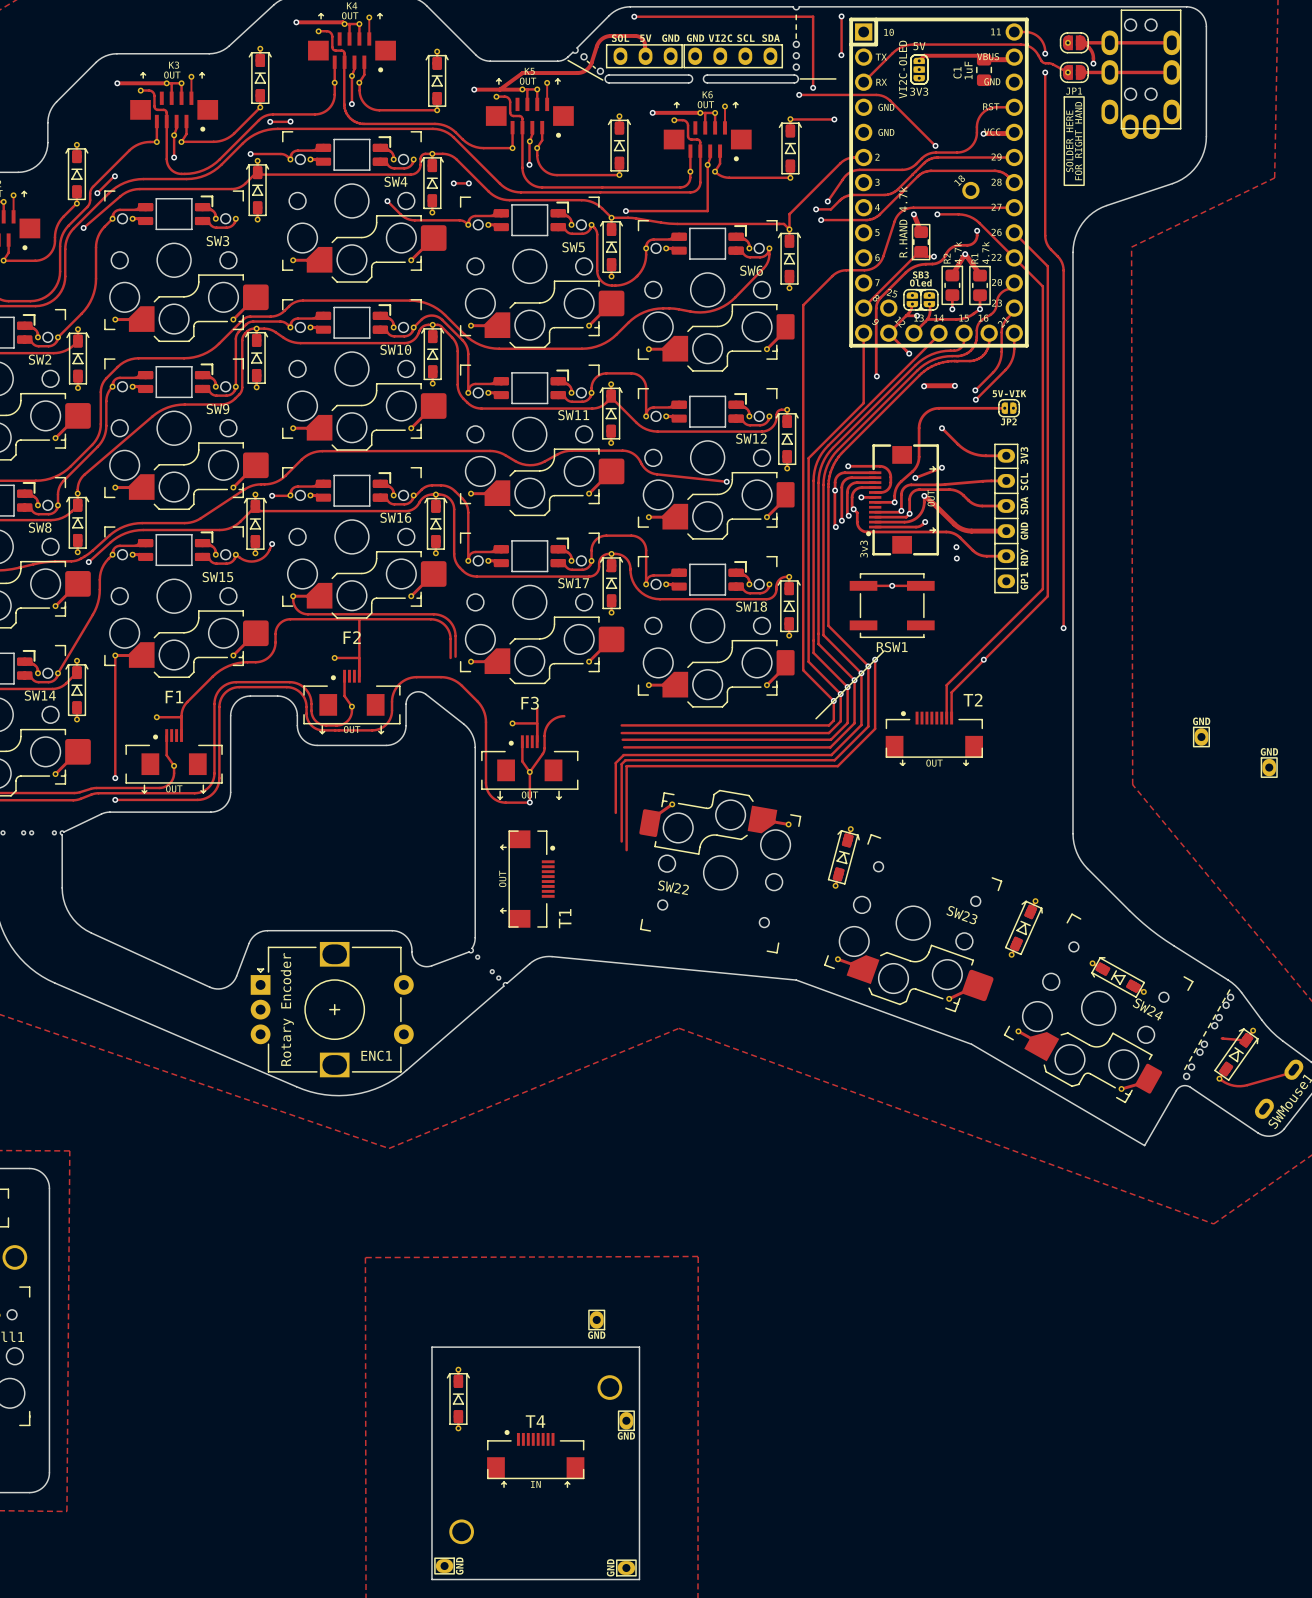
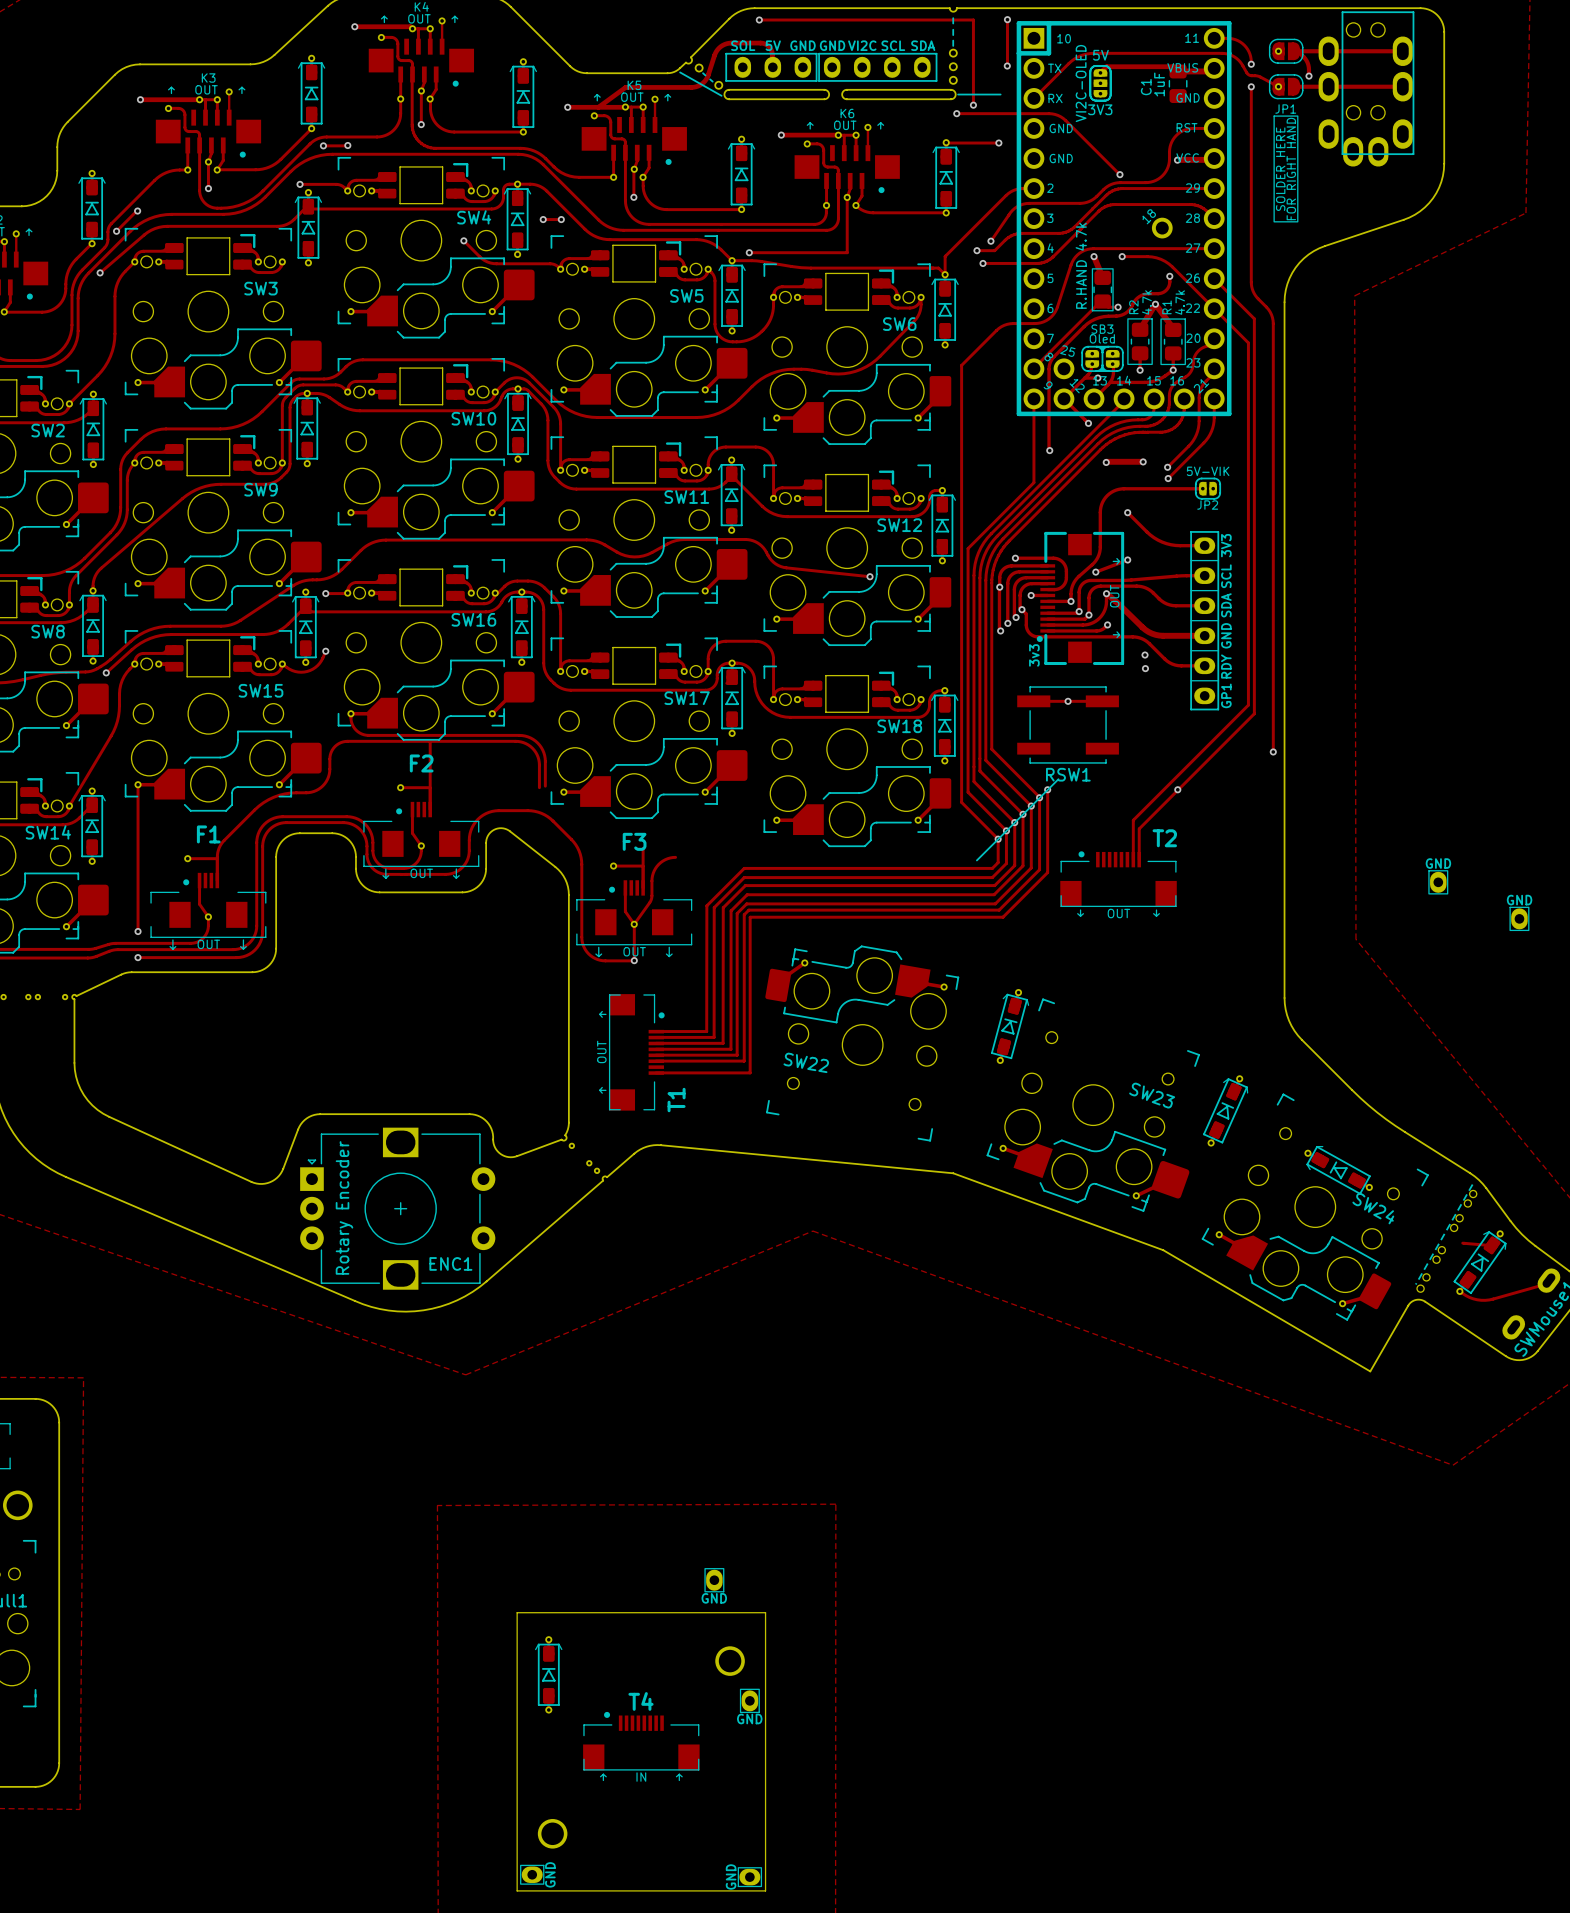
track: none -> (744, 868) (706, 905) (706, 1031) (655, 1031)
track: none -> (744, 877) (714, 907) (714, 1037) (655, 1037)
track: none -> (745, 885) (723, 907) (723, 1043) (655, 1043)
track: none -> (747, 894) (731, 910) (730, 1049) (655, 1049)
track: none -> (737, 973) (737, 1055) (655, 1055)
track: none -> (744, 1007) (744, 1060)
track: none -> (750, 1017) (750, 1072) (655, 1072)
track: none -> (655, 1061) (744, 1061)

